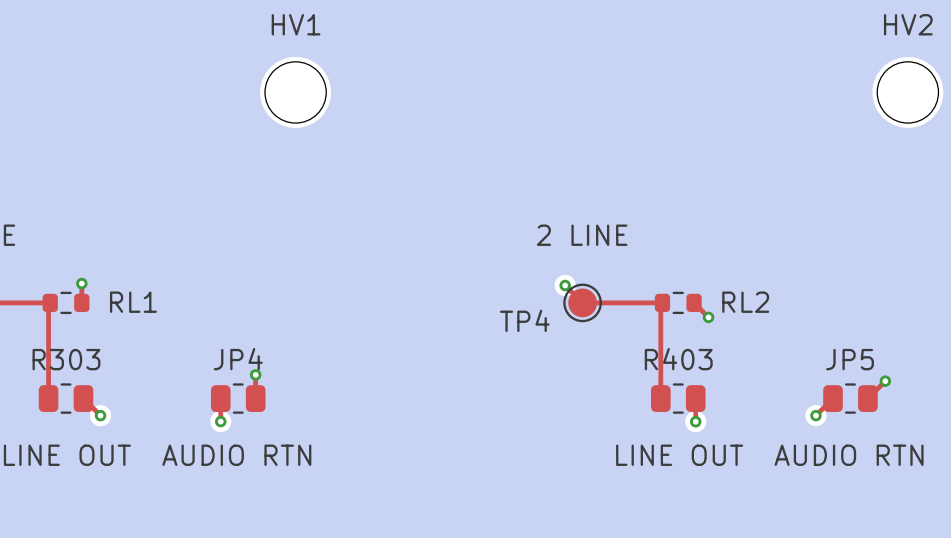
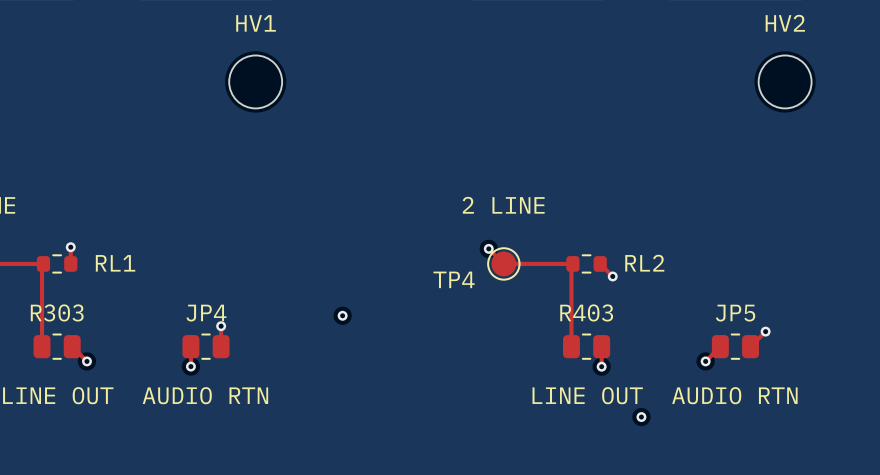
via: none -> (342, 315)
via: none -> (641, 417)

